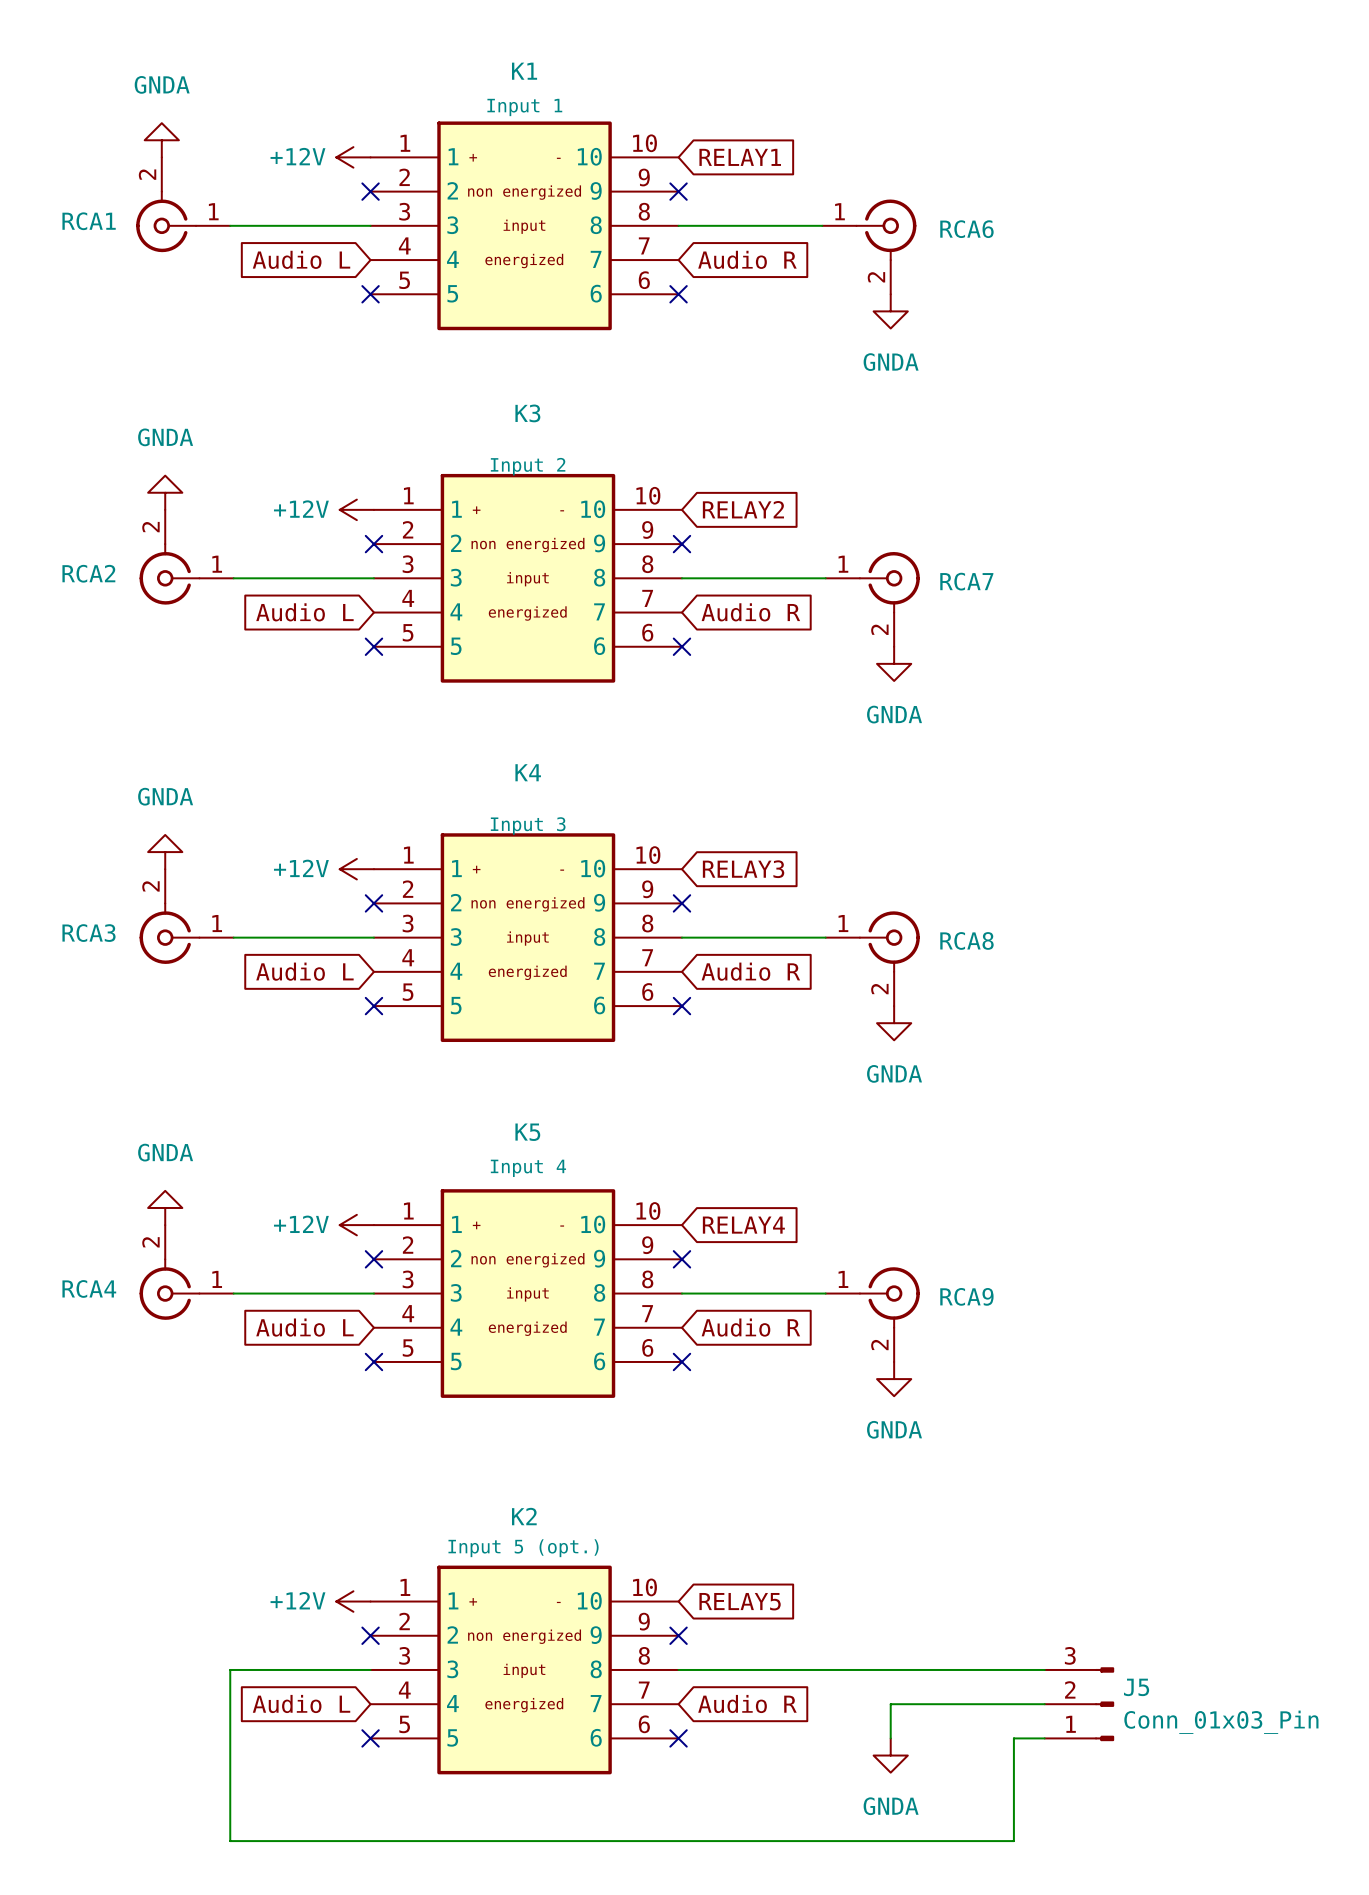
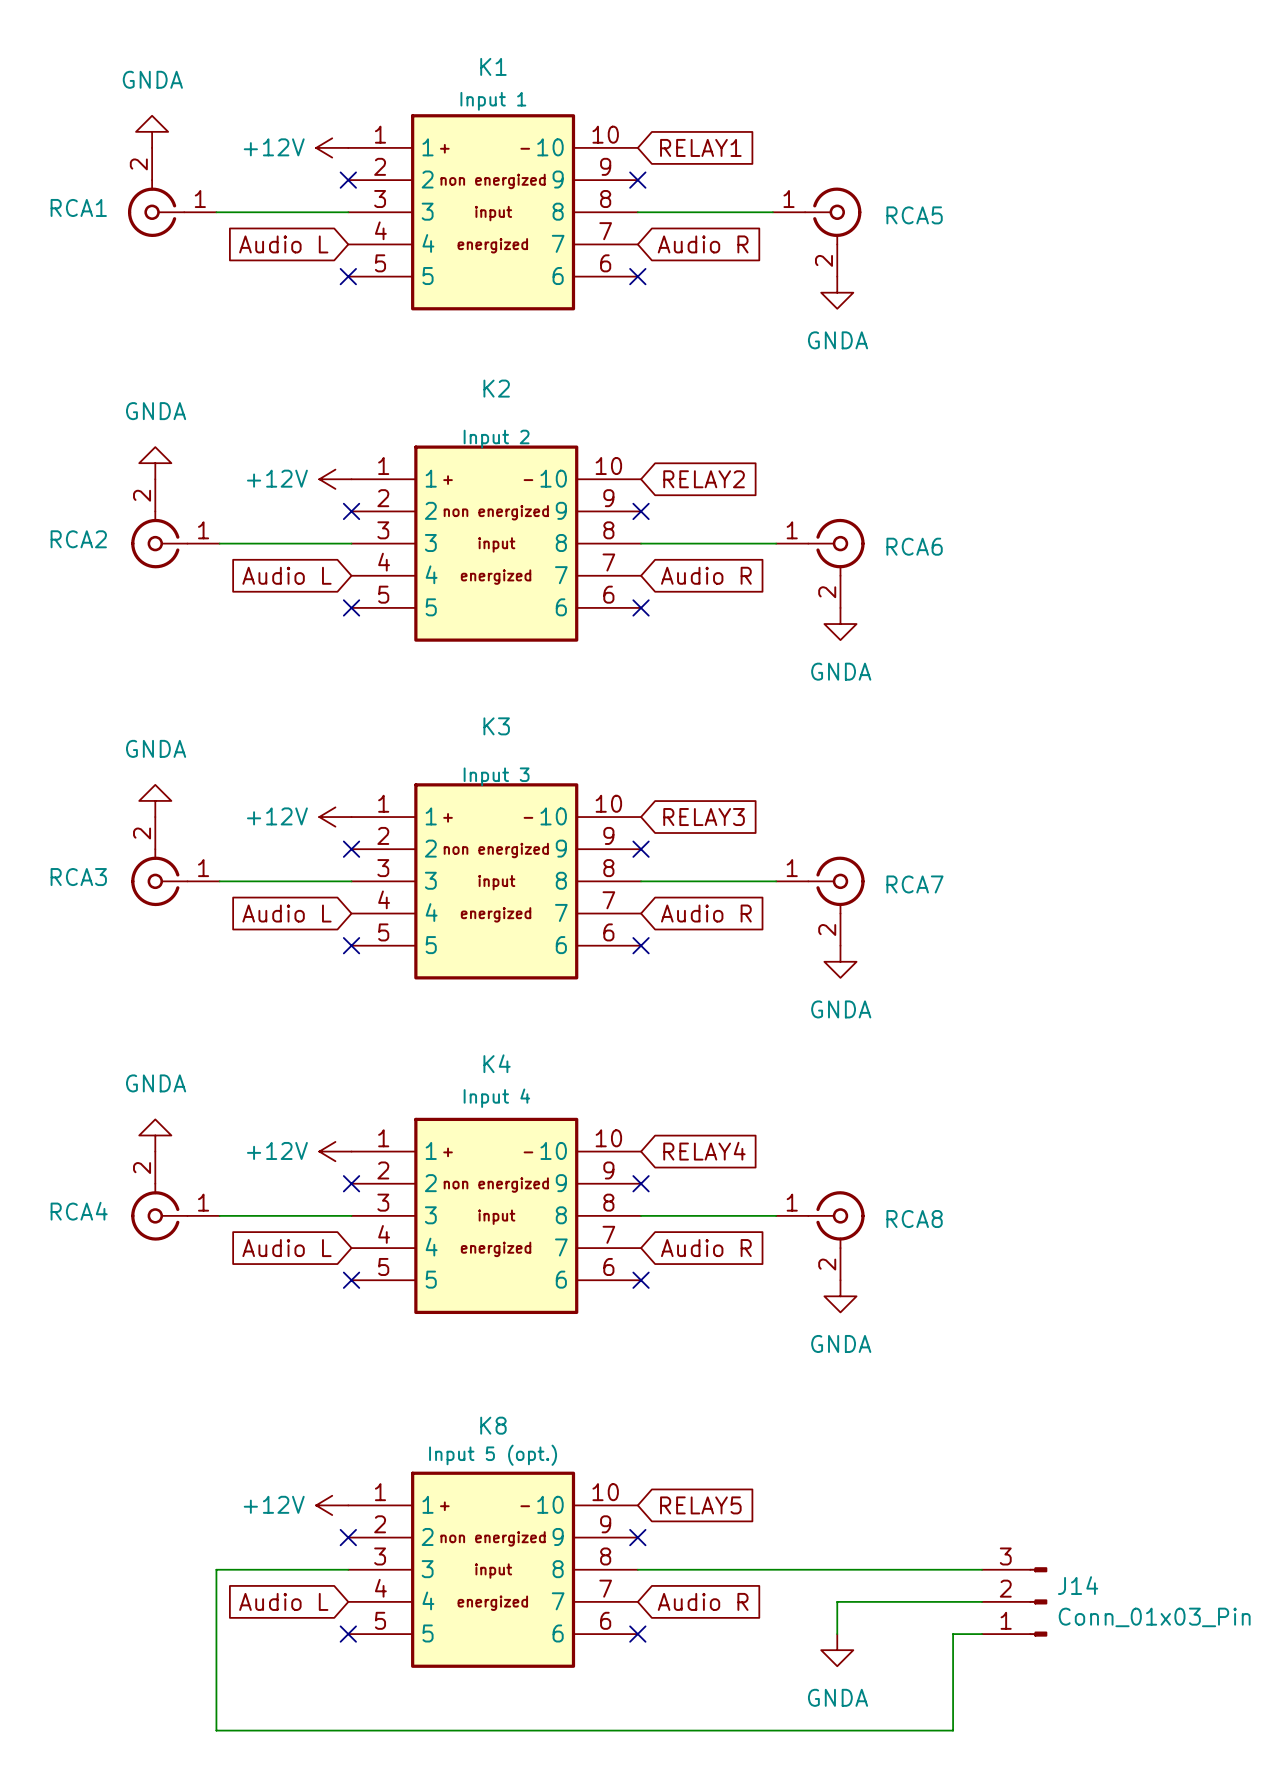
RCA6 name: RCA6 (966, 229) -> RCA5 (914, 215)
K3 name: K3 (527, 413) -> K2 (496, 388)
RCA7 name: RCA7 (966, 581) -> RCA6 (914, 546)
K4 name: K4 (528, 772) -> K3 (496, 726)
RCA8 name: RCA8 (966, 940) -> RCA7 (914, 884)
K5 name: K5 (527, 1132) -> K4 (497, 1063)
RCA9 name: RCA9 (966, 1296) -> RCA8 (914, 1219)
K2 name: K2 (524, 1516) -> K8 (493, 1425)
J5 name: J5 (1136, 1687) -> J14 (1078, 1585)

